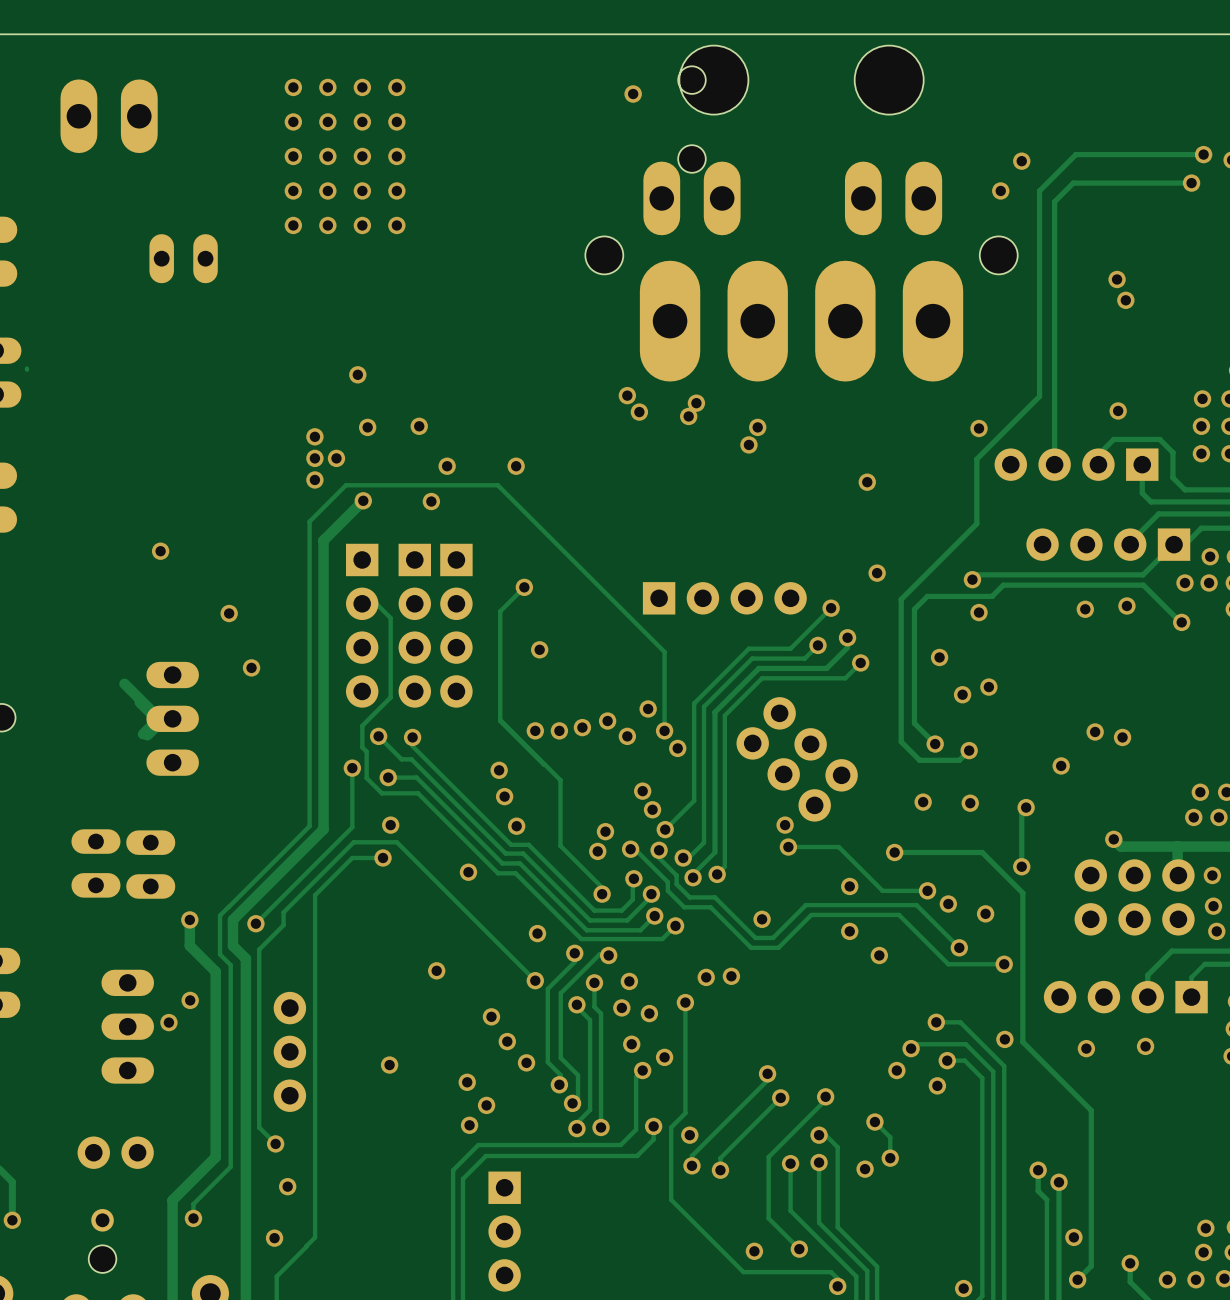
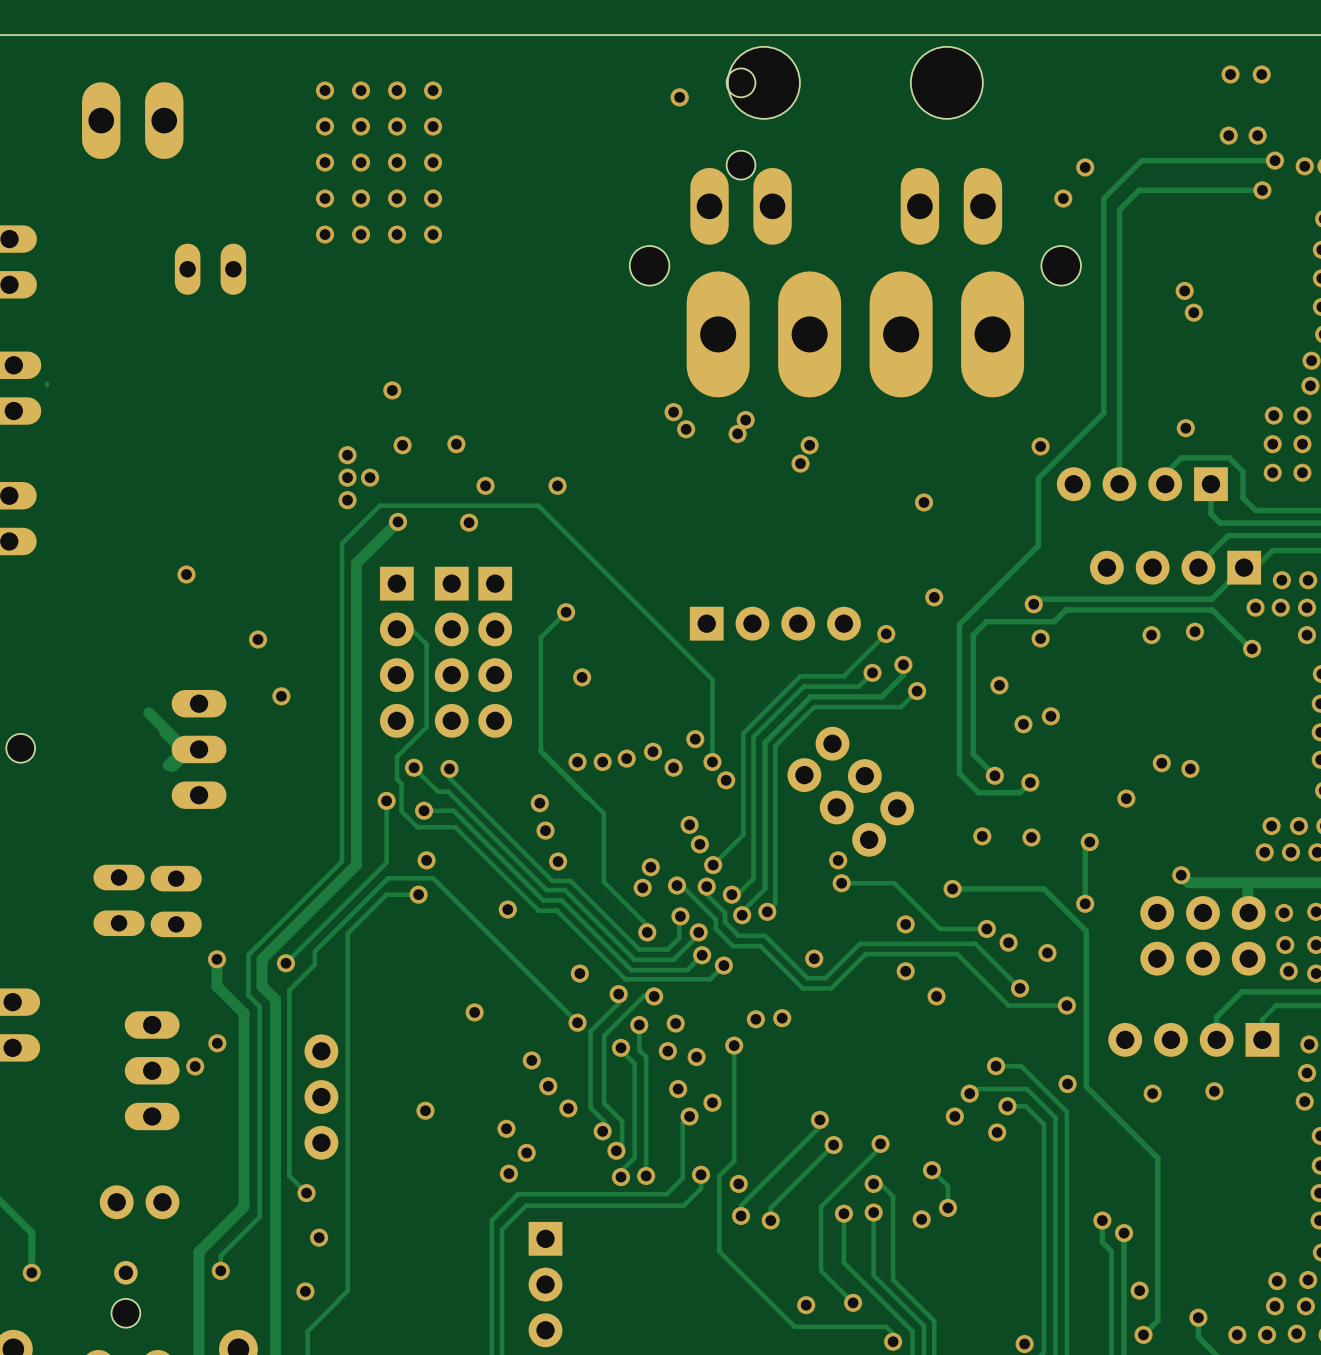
via: none -> (1230, 74)
via: none -> (1261, 74)
via: none -> (1228, 135)
via: none -> (1257, 135)

